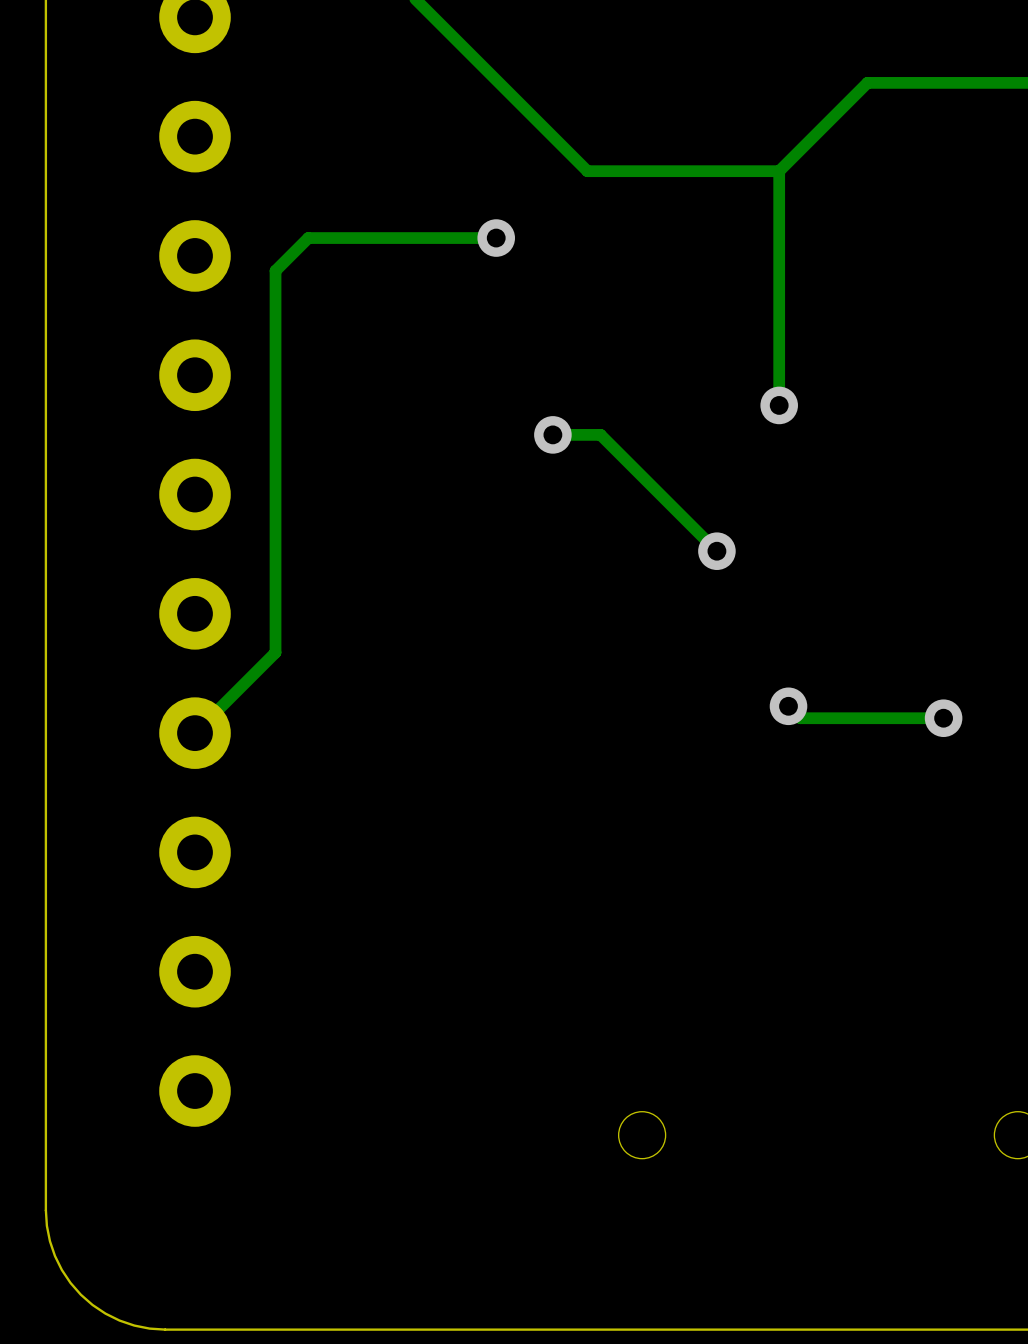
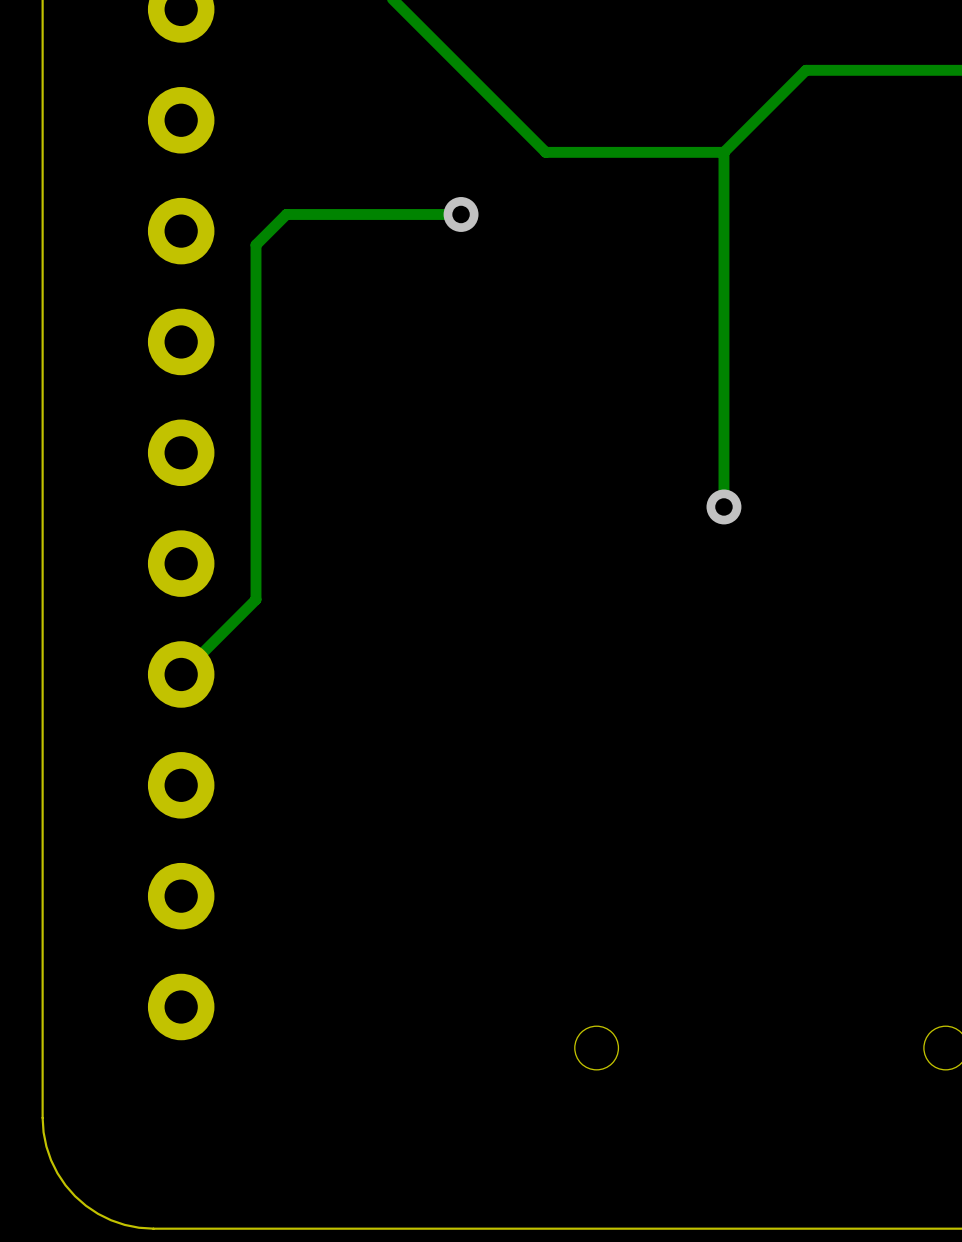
track: none -> (723, 370) (723, 506)
via: (779, 405) -> none
track: (552, 434) (600, 434) (716, 551) -> none
via: (552, 434) -> none
via position: (716, 551) -> (723, 506)
track: (788, 706) (800, 718) (943, 718) -> none
via: (788, 706) -> none
via: (943, 718) -> none

